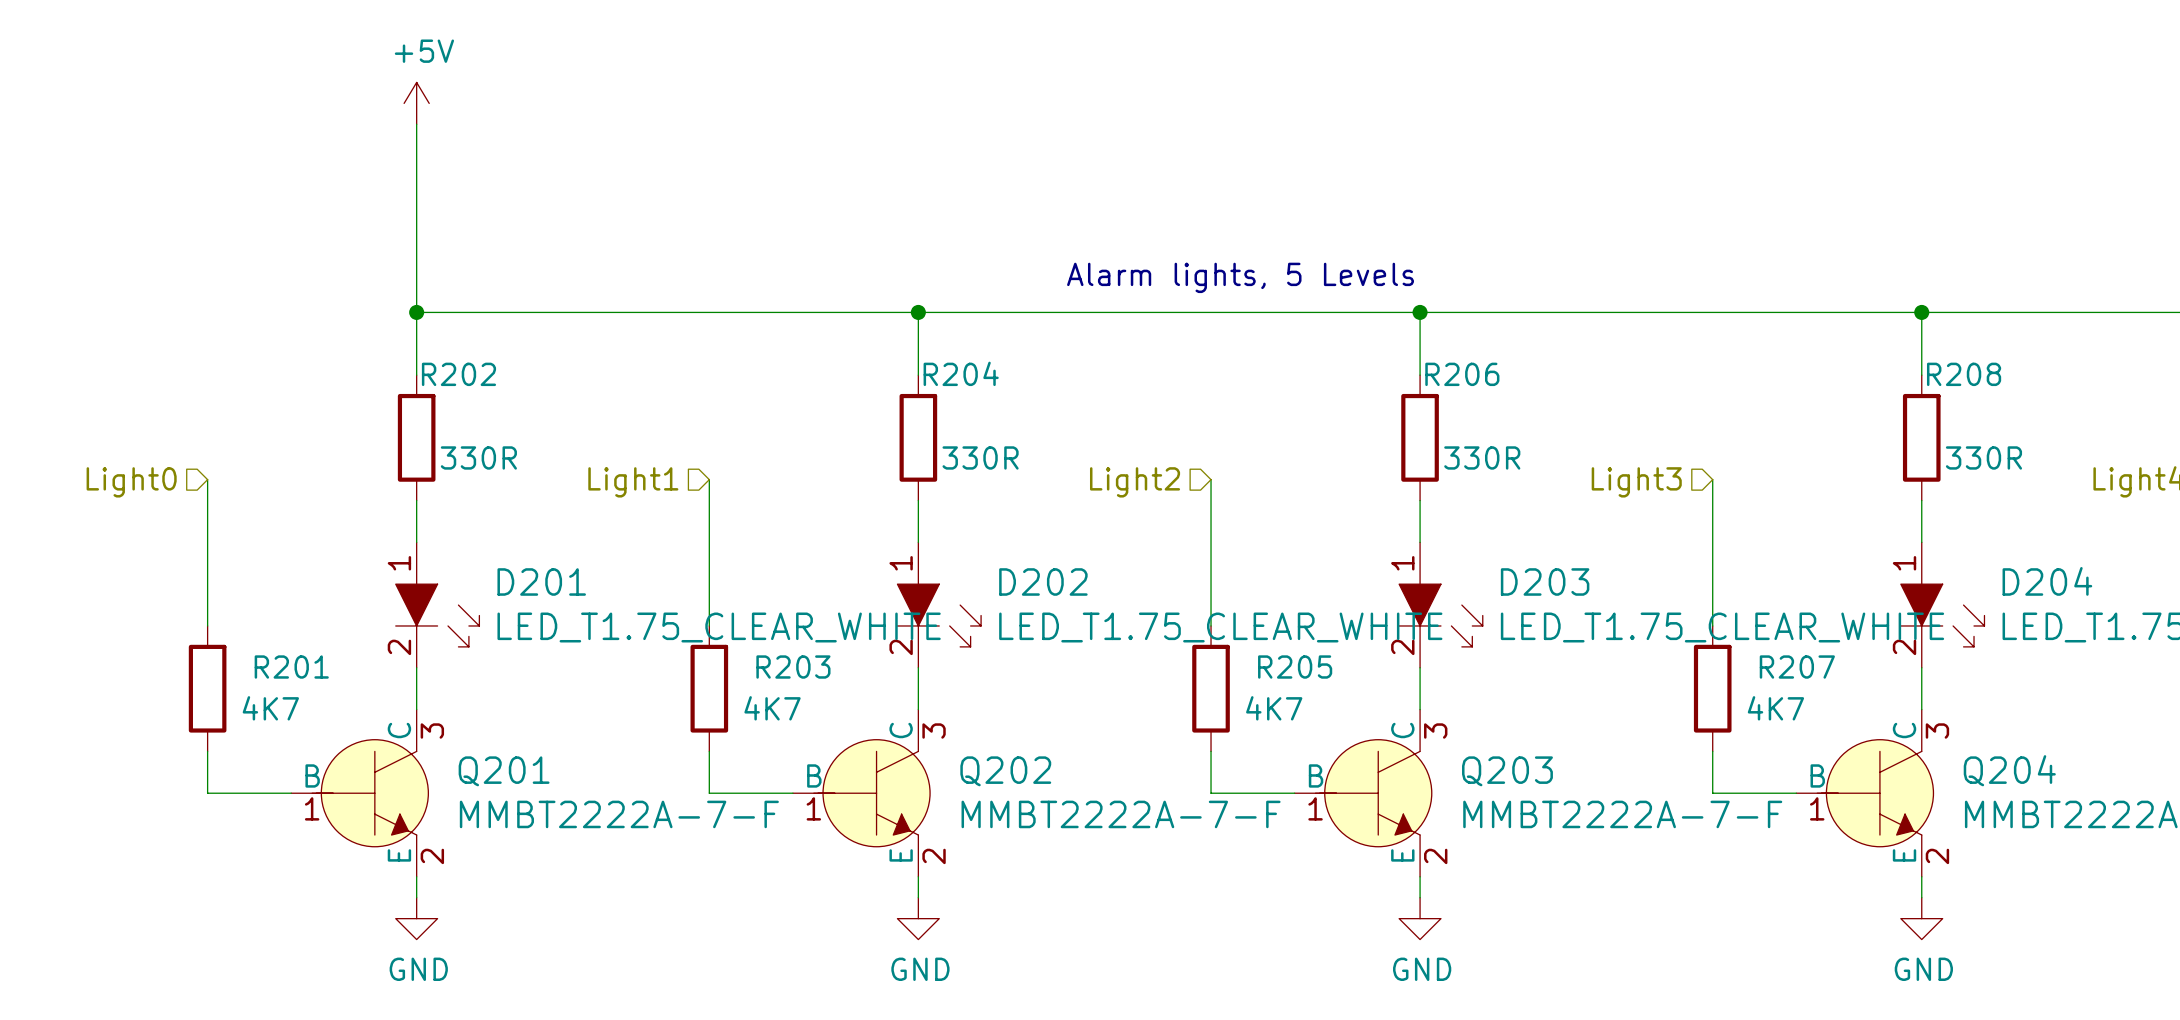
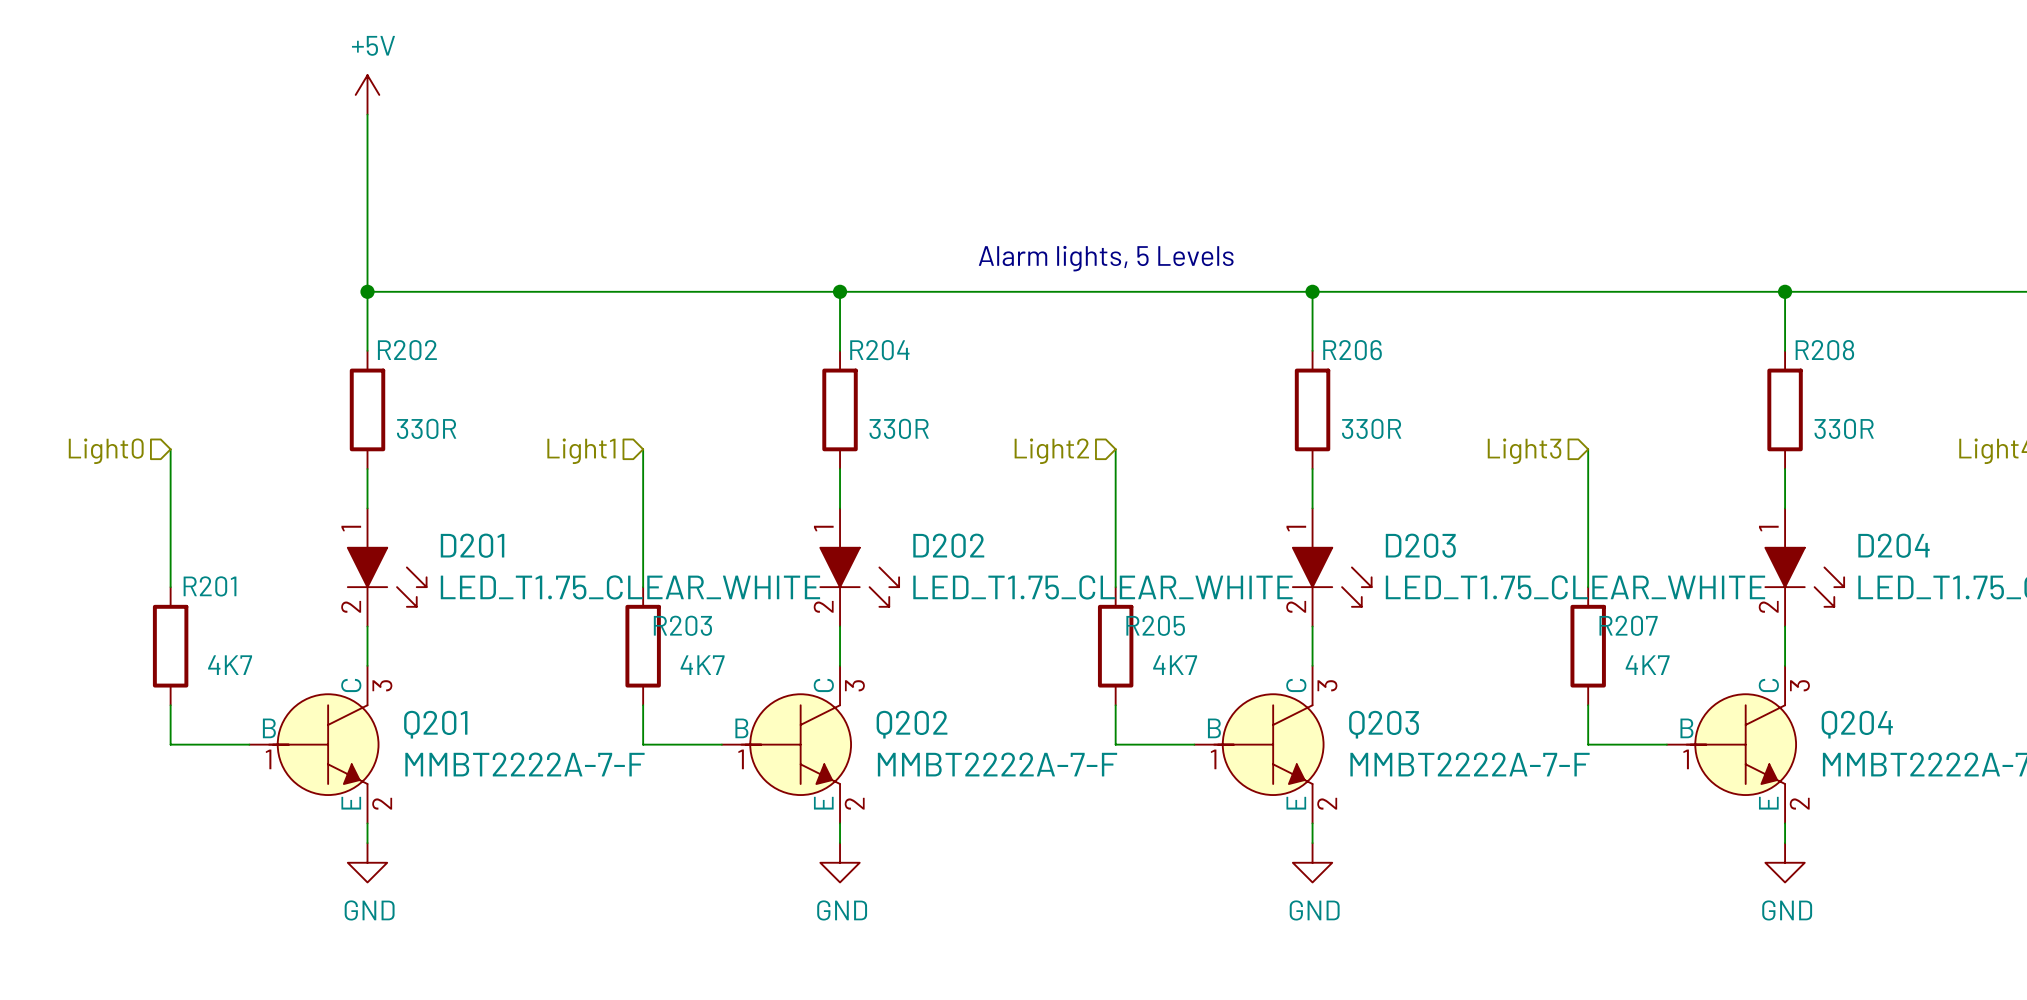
R201 name position: R201 (291, 667) -> R201 (210, 586)
R203 name position: R203 (793, 667) -> R203 (682, 625)
R205 name position: R205 (1295, 667) -> R205 (1155, 625)
R207 name position: R207 (1797, 667) -> R207 (1628, 625)

